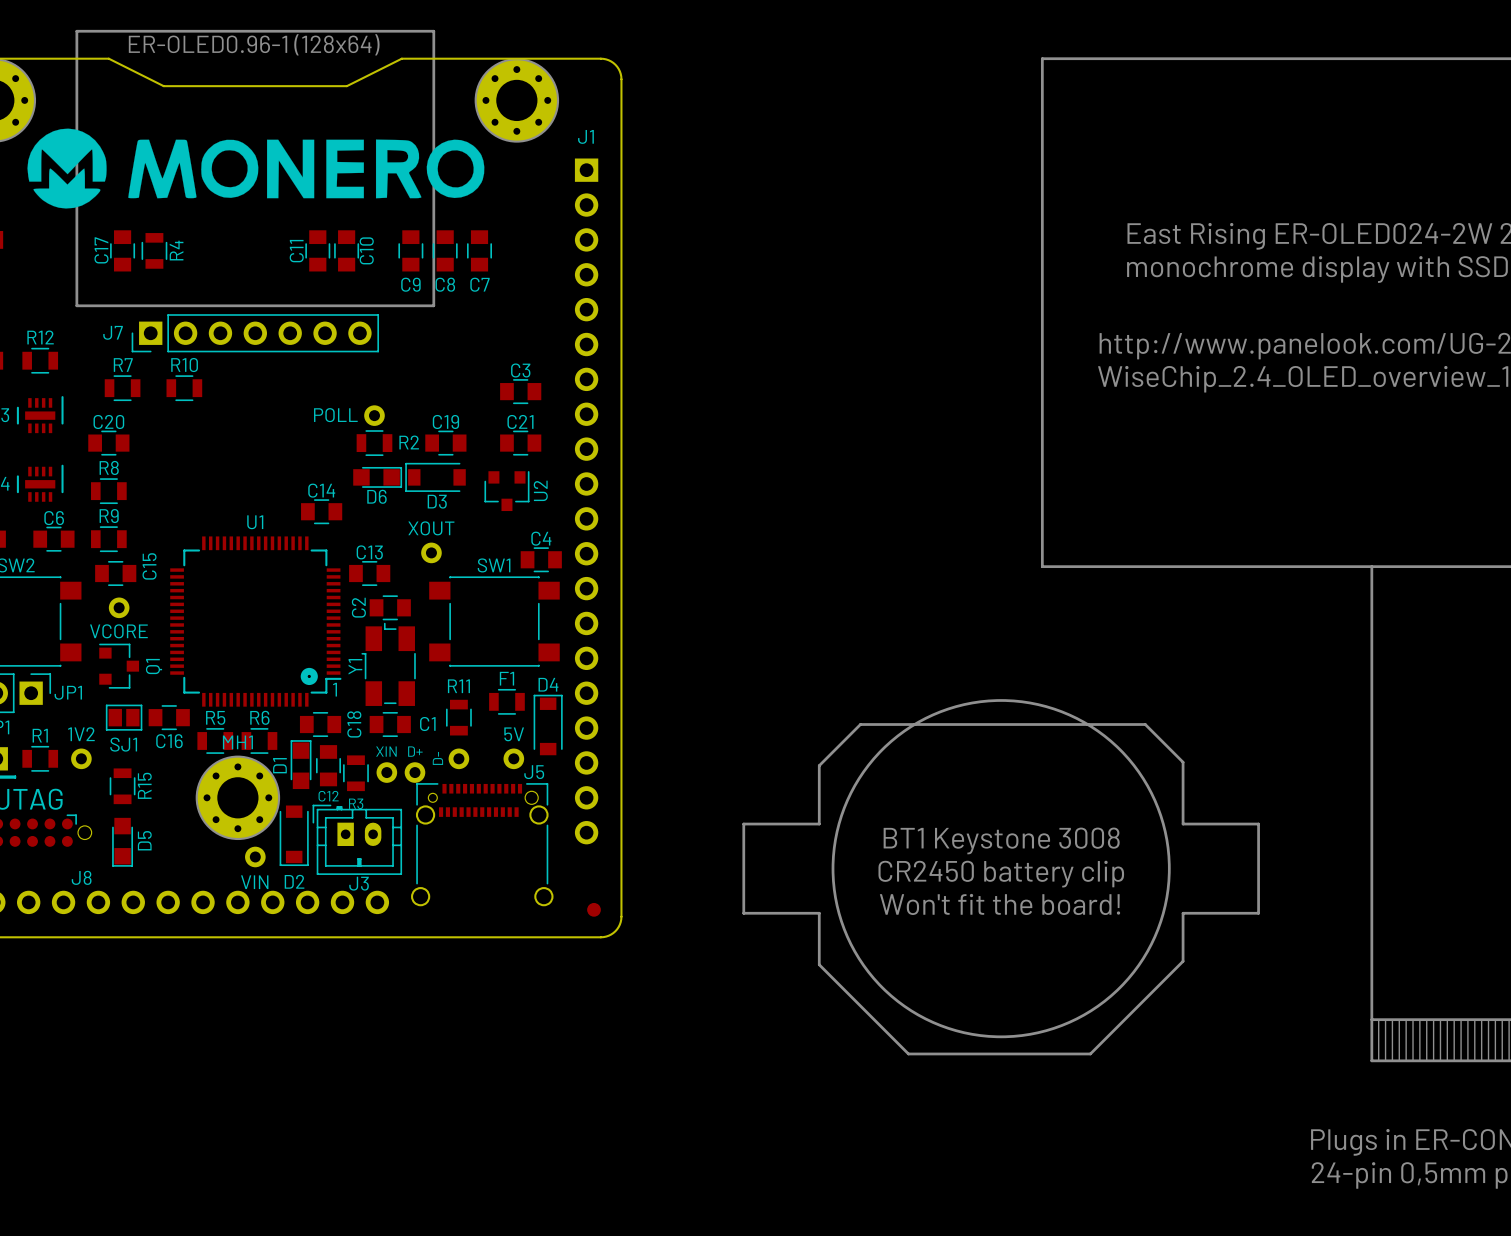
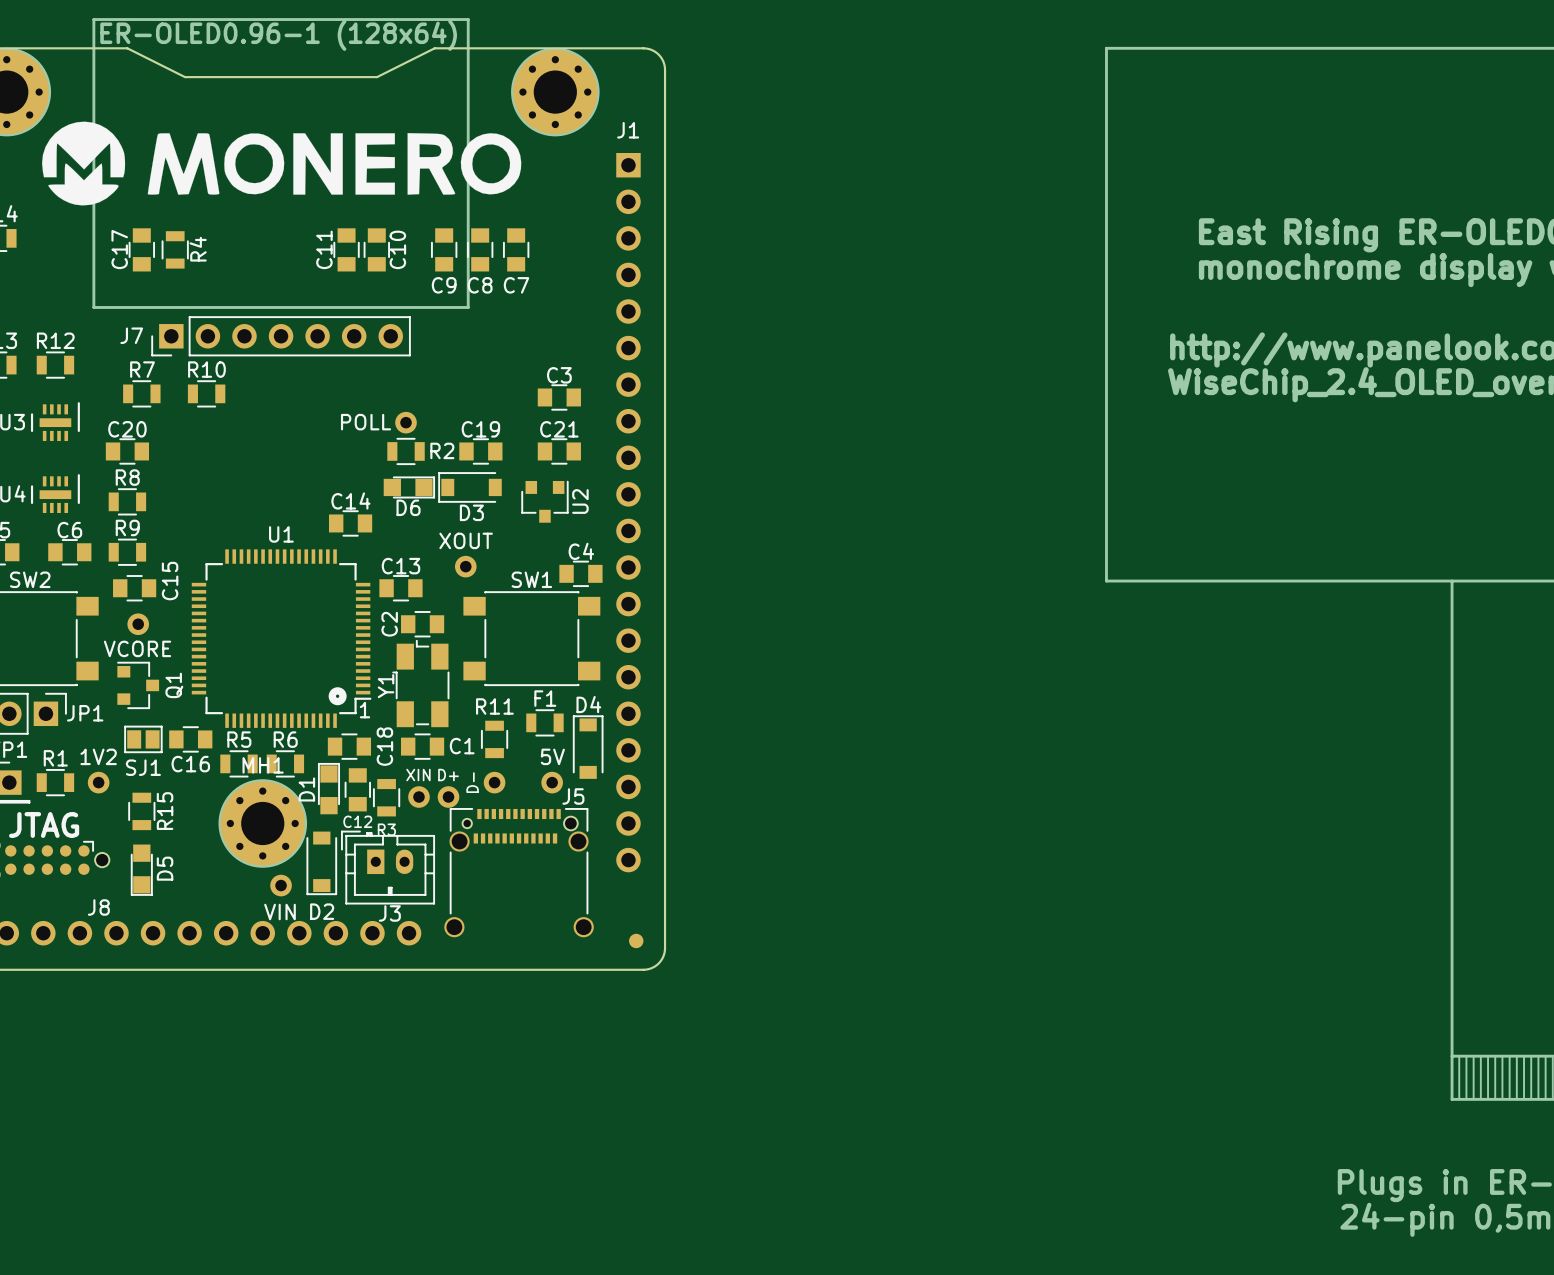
drawing: [831, 699, 1171, 1039] -> none
line: (860, 724) (1145, 724) (1183, 762) (1183, 824) (1258, 824) (1258, 913) (1183, 913) (1183, 961) (1090, 1053) (908, 1053) (819, 964) (819, 913) (743, 913) (743, 824) (819, 824) (819, 765) (860, 724) -> none
text: BT1 Keystone 3008 (1001, 840) -> none
text: CR2450 battery clip (1001, 874) -> none
text: Won't fit the board! (1000, 904) -> none

